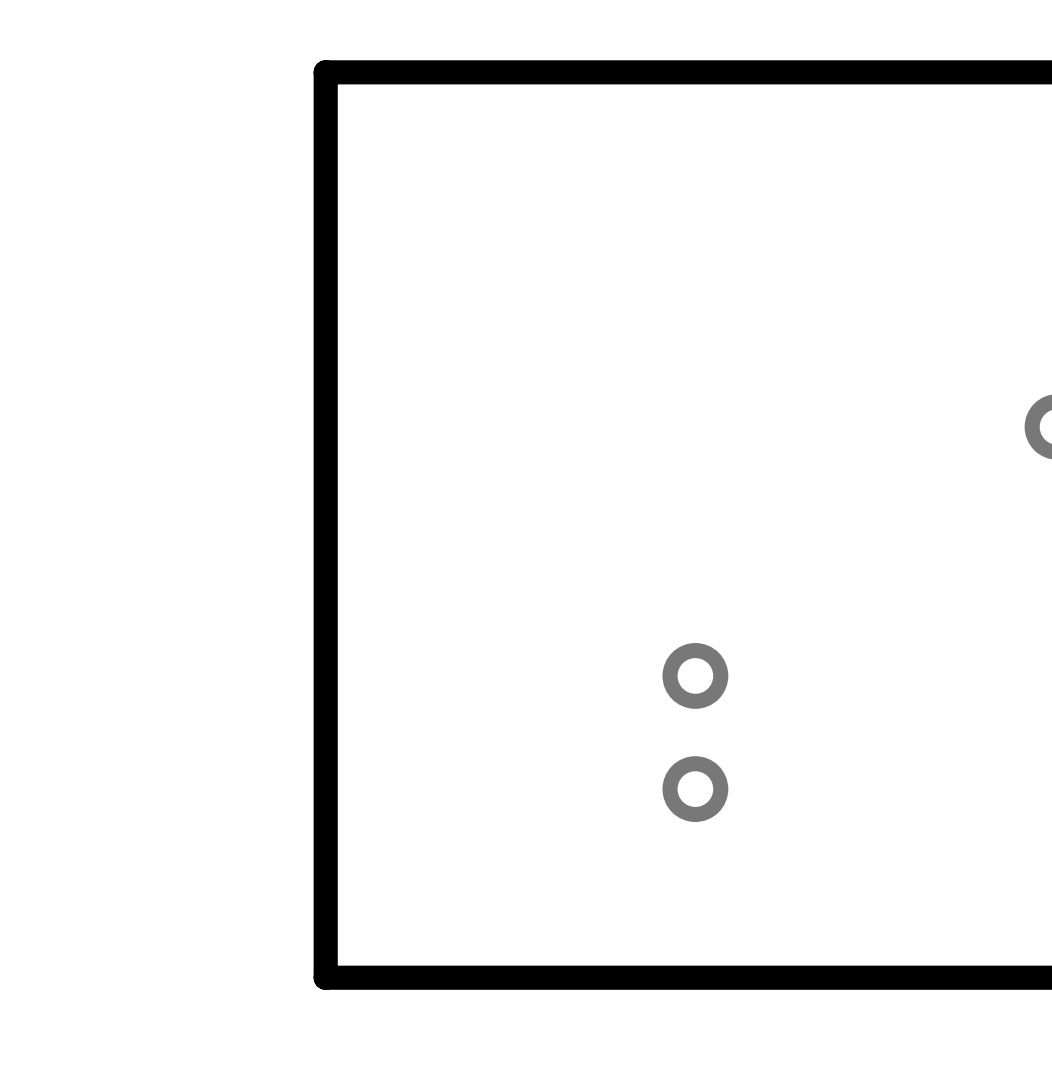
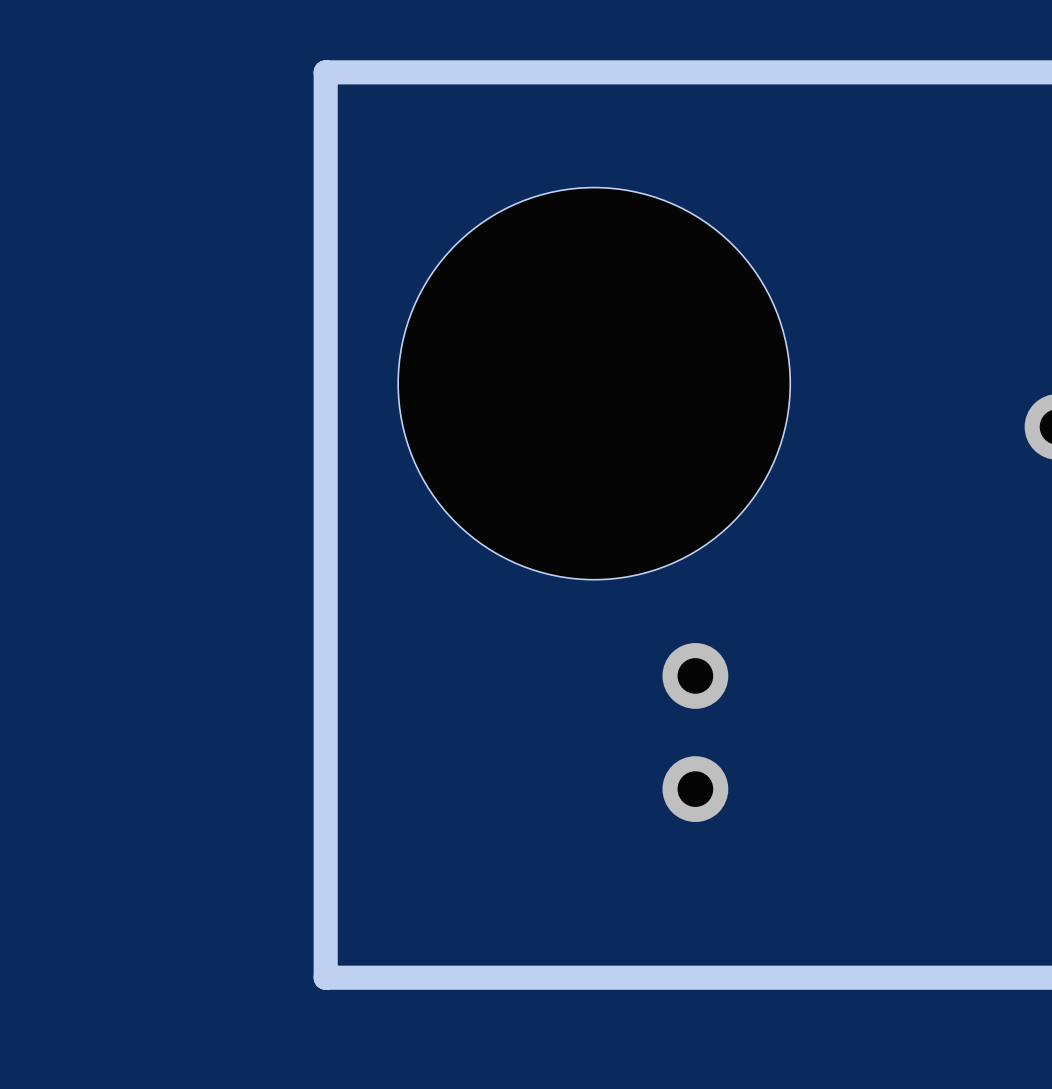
hole: none -> (594, 383)

